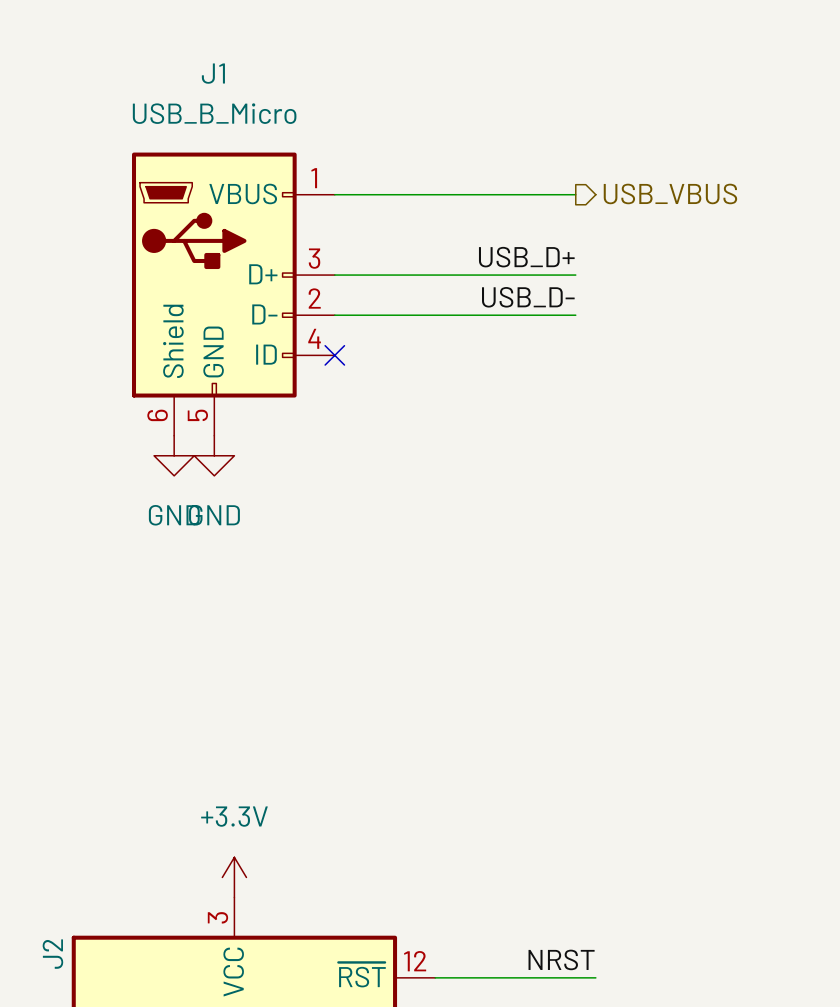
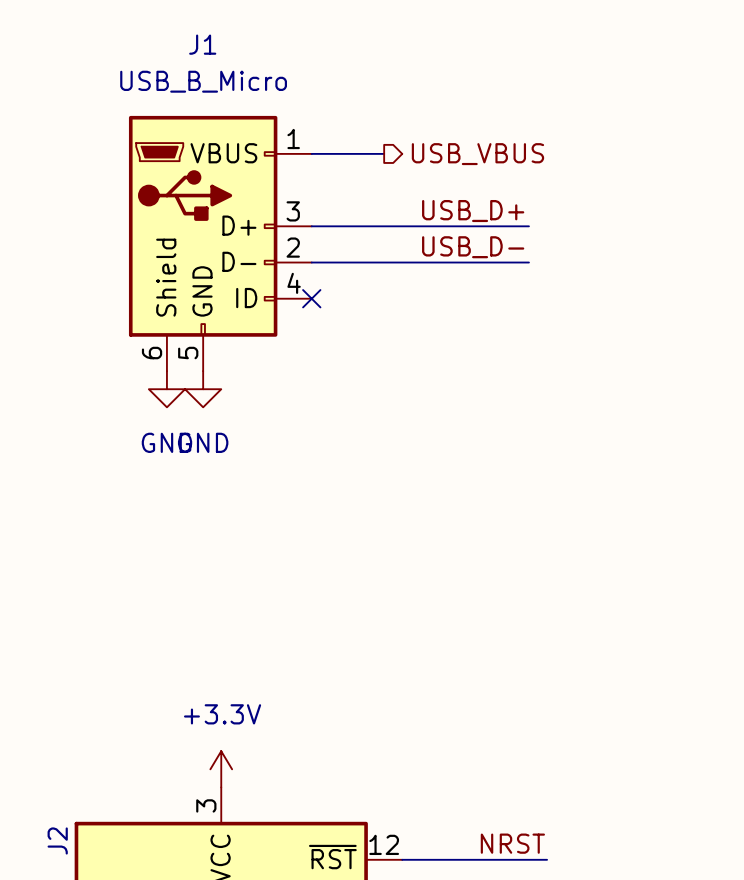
hierarchical label position: USB_VBUS (670, 193) -> USB_VBUS (477, 154)
wire: (415, 194) (575, 194) -> none

